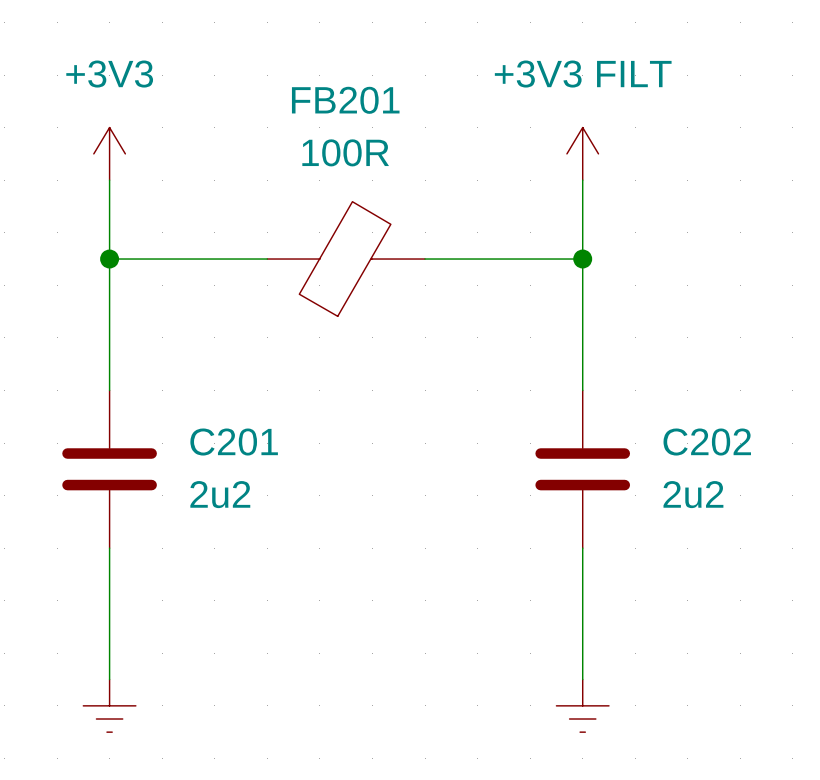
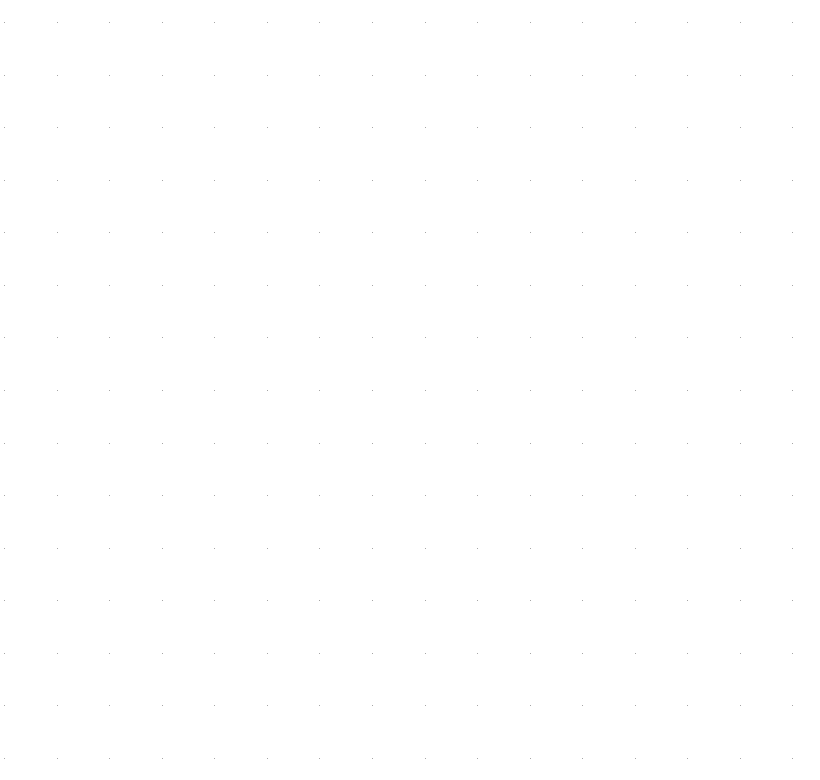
power symbol: +3V3 (109, 153) -> none
power symbol: +3V3 FILT (582, 153) -> none
wire: (109, 180) (109, 390) -> none
wire: (582, 180) (582, 390) -> none
wire: (109, 259) (267, 259) -> none
junction: (109, 259) -> none
FB201: 100R (346, 259) -> none
wire: (425, 259) (582, 259) -> none
junction: (582, 259) -> none
C201: 2u2 (109, 469) -> none
C202: 2u2 (582, 469) -> none
wire: (109, 548) (109, 679) -> none
wire: (582, 548) (582, 679) -> none
power symbol: (109, 705) -> none
power symbol: (582, 705) -> none

